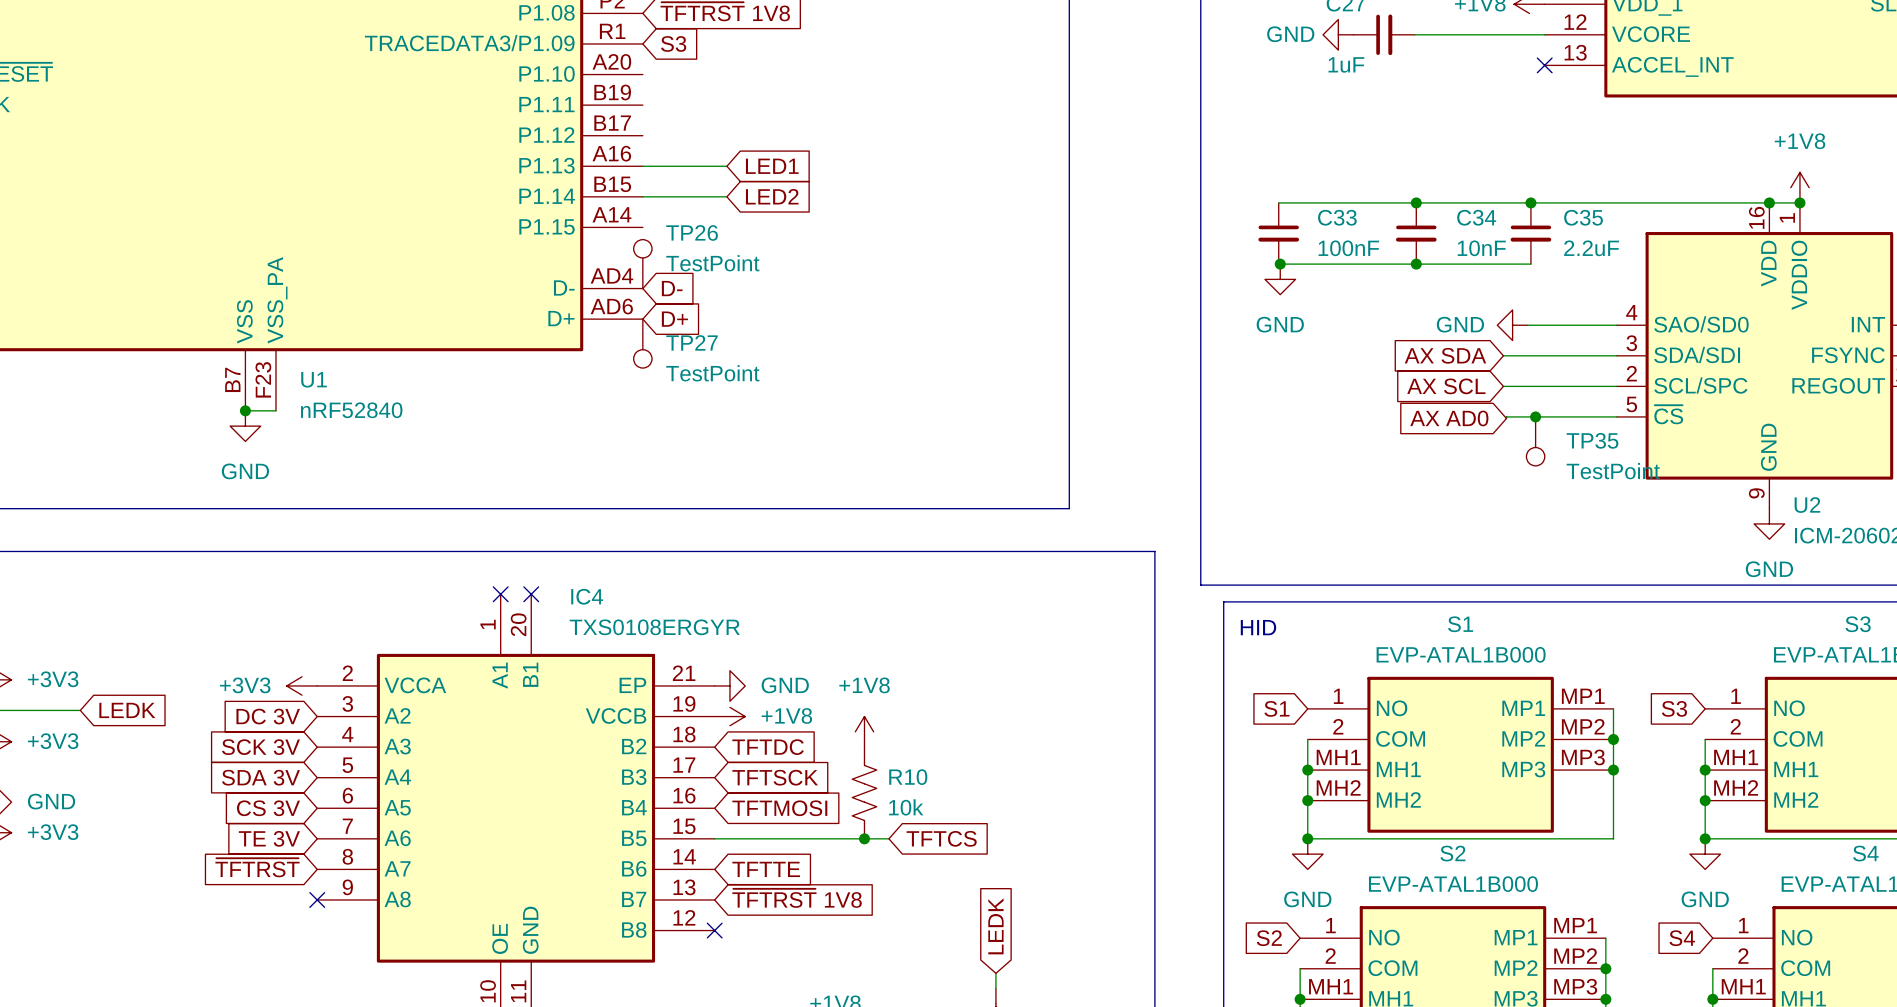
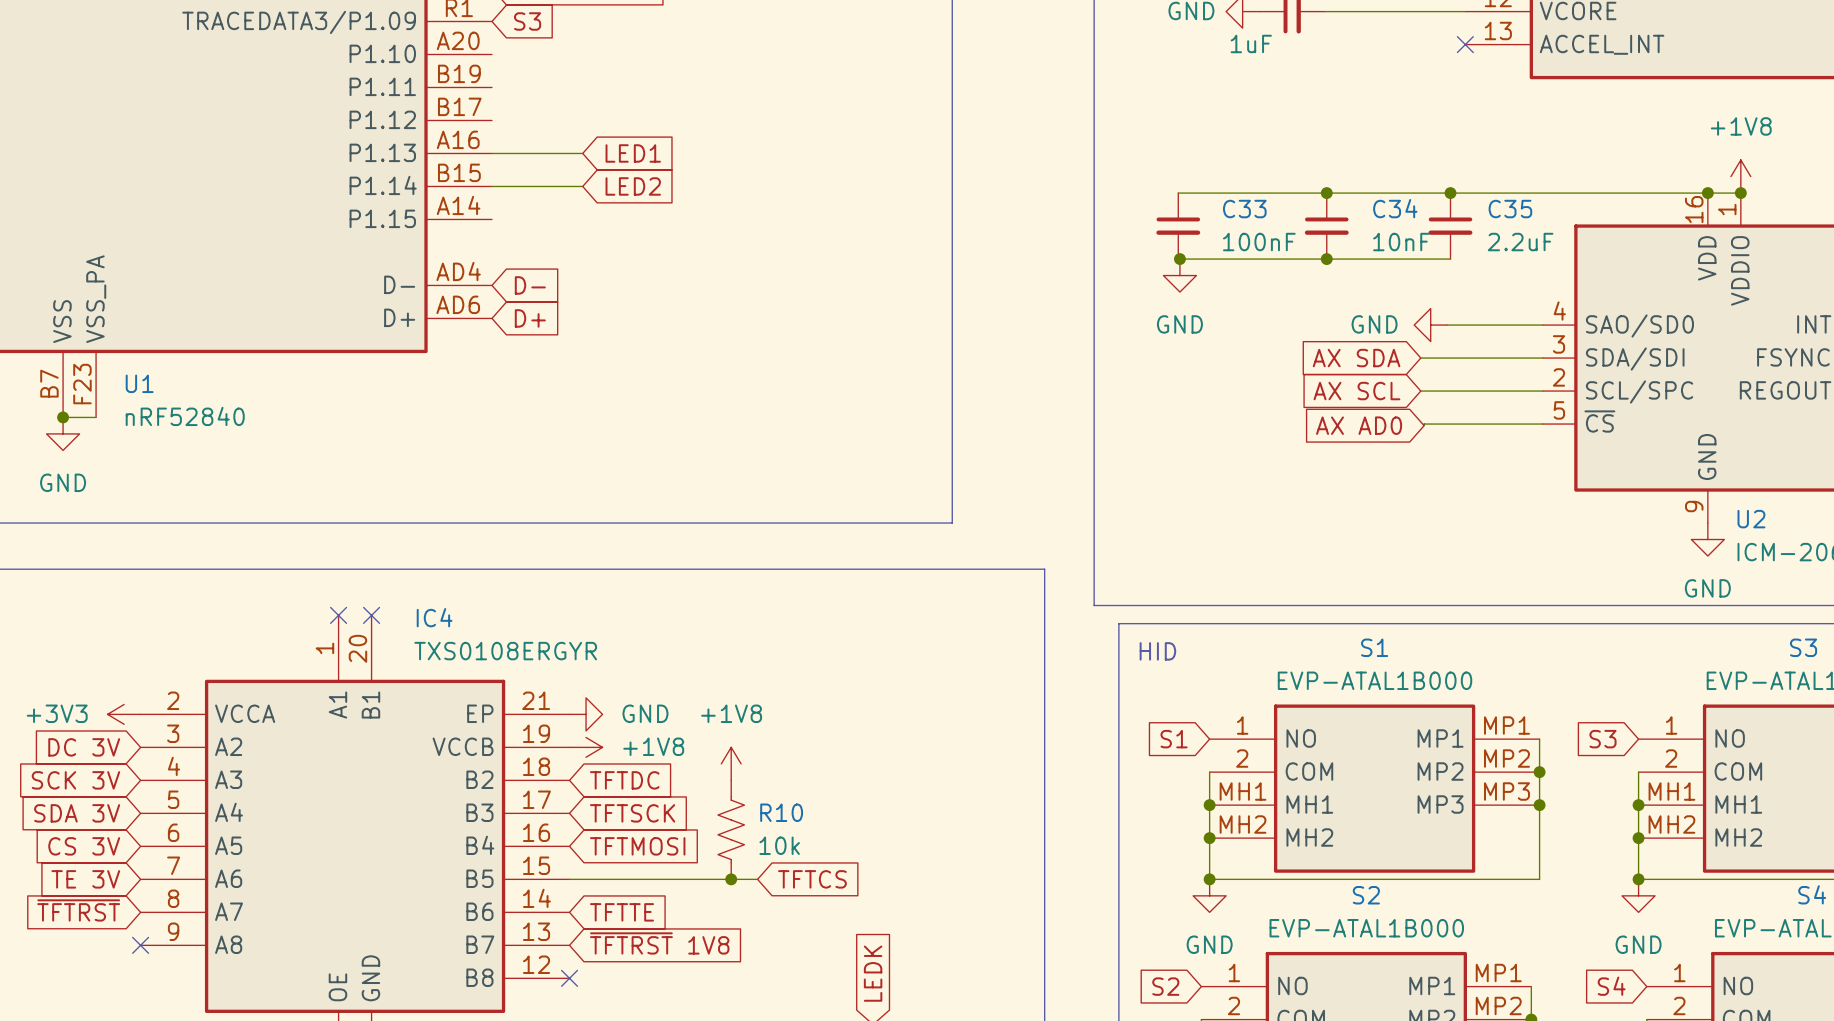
TP26: TestPoint (642, 264) -> none
TP27: TestPoint (642, 343) -> none
junction: (1535, 416) -> none
TP35: TestPoint (1535, 441) -> none

